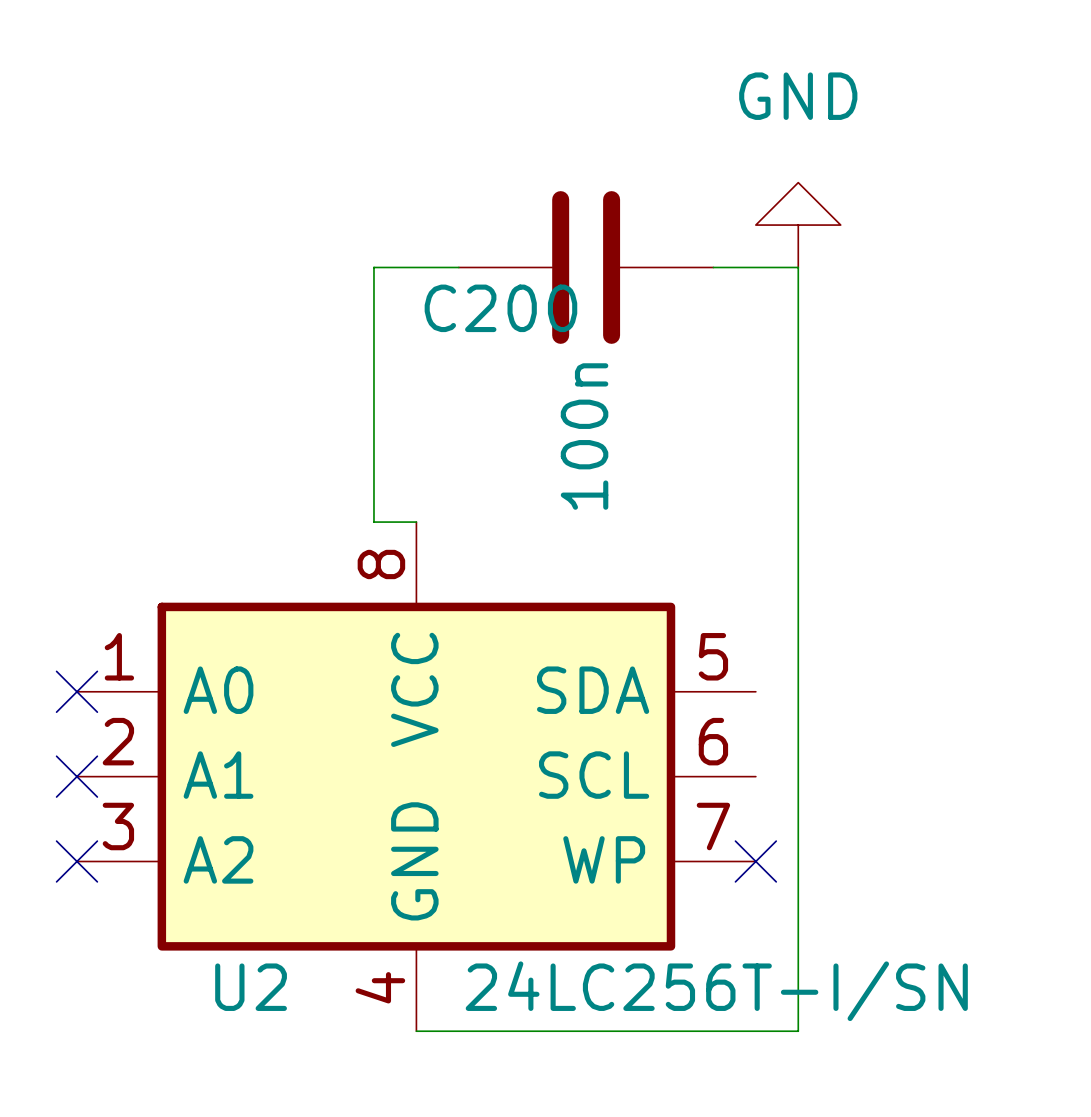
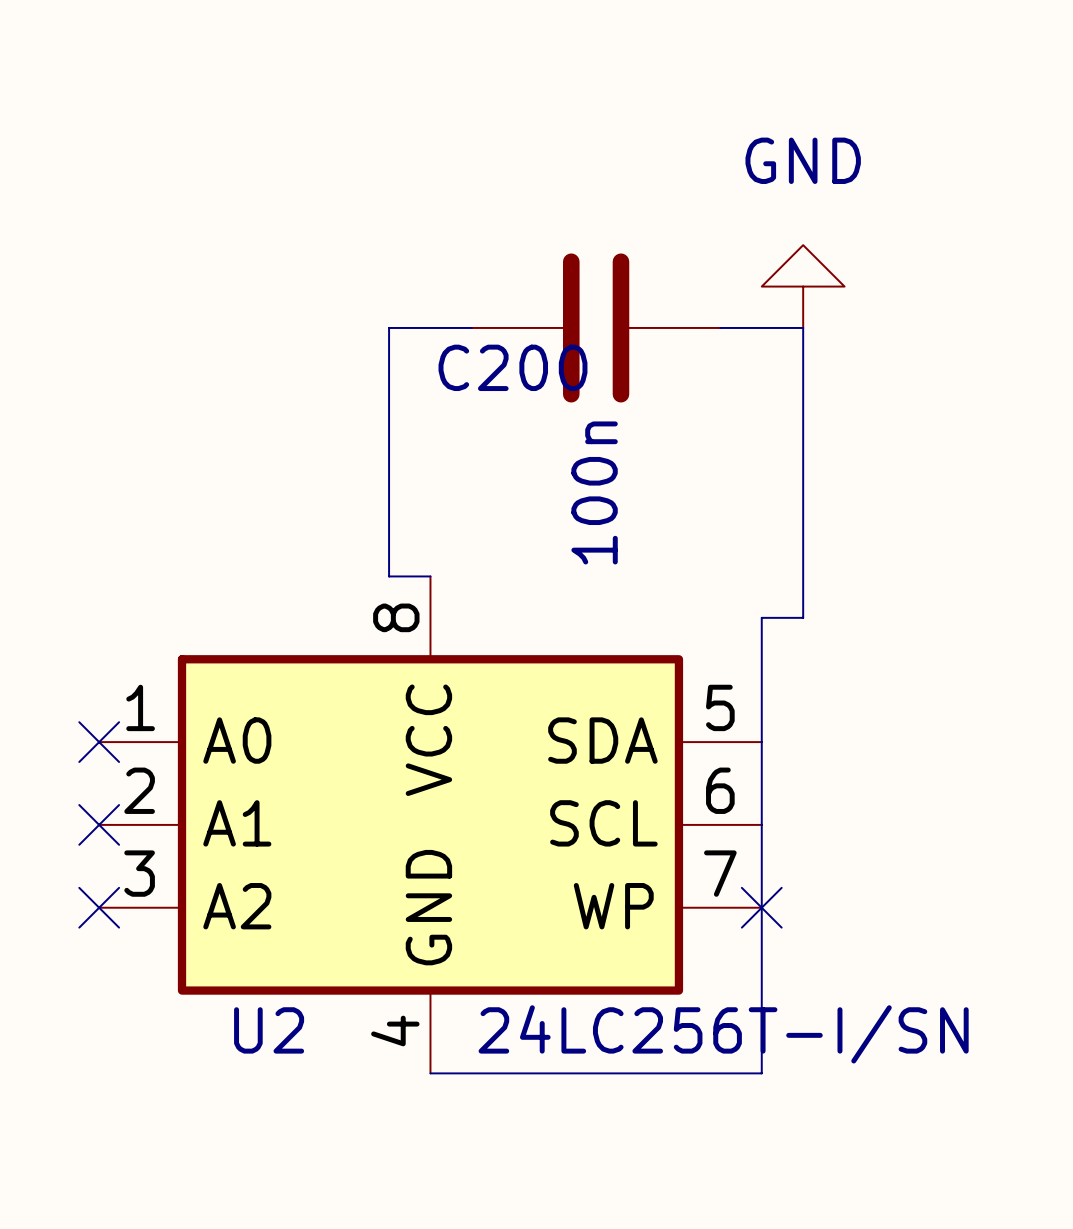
wire: (798, 564) (798, 1031) (755, 1031) -> (803, 617) (761, 617) (761, 1073)

